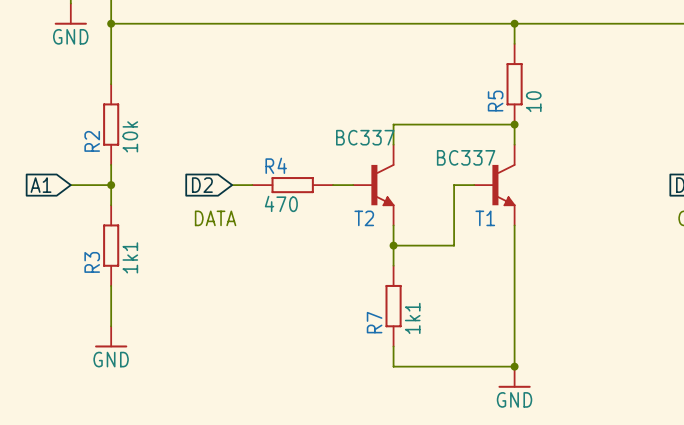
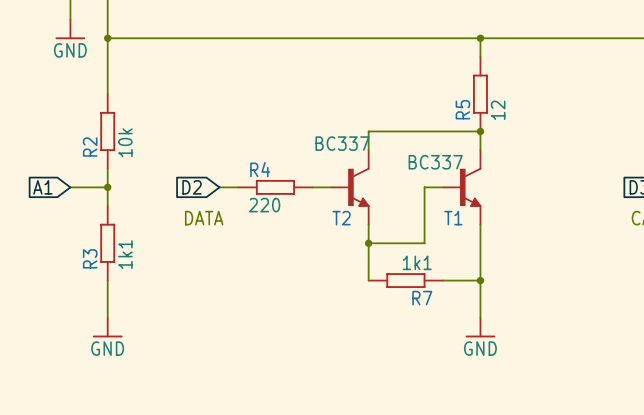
R5 value: 10 (533, 101) -> 12 (498, 110)
R4 value: 470 (281, 203) -> 220 (264, 205)
wire: none -> (443, 280) (480, 280)
junction: none -> (480, 280)
R7 rotation: 0° (393, 306) -> 90° clockwise (405, 280)
R7 value position: 1k1 (412, 318) -> 1k1 (417, 262)
R7 name position: R7 (374, 322) -> R7 (422, 298)
wire: (514, 326) (514, 366) (393, 366) (393, 346) -> none
junction: (514, 366) -> none
power symbol position: GND (514, 377) -> GND (480, 327)

